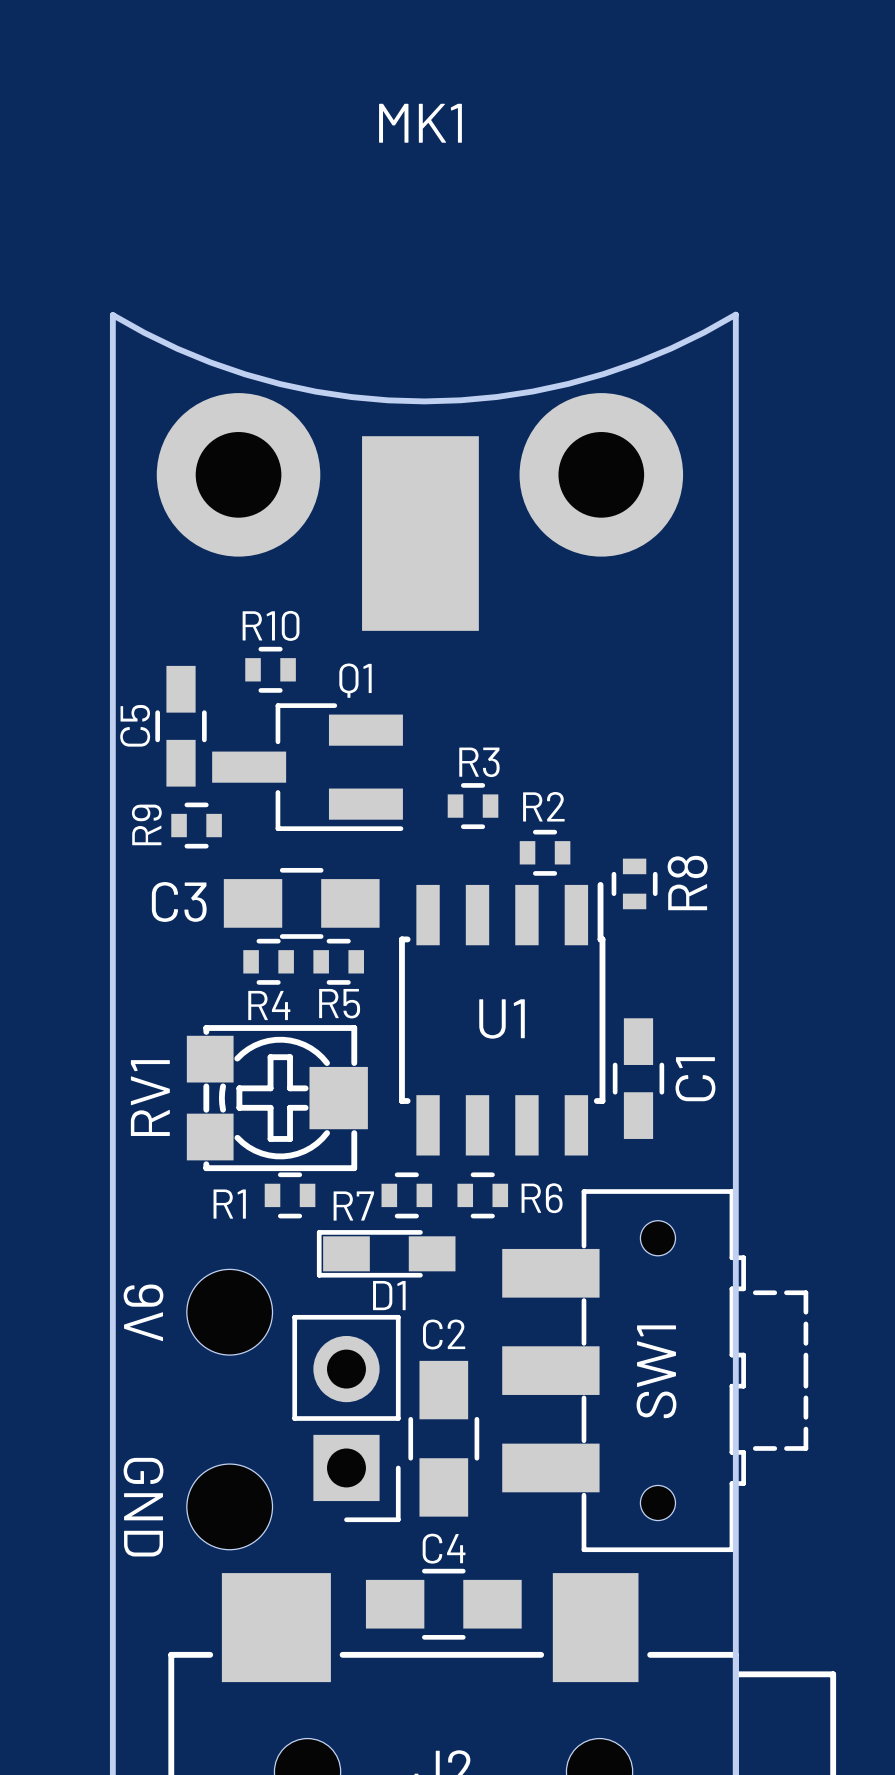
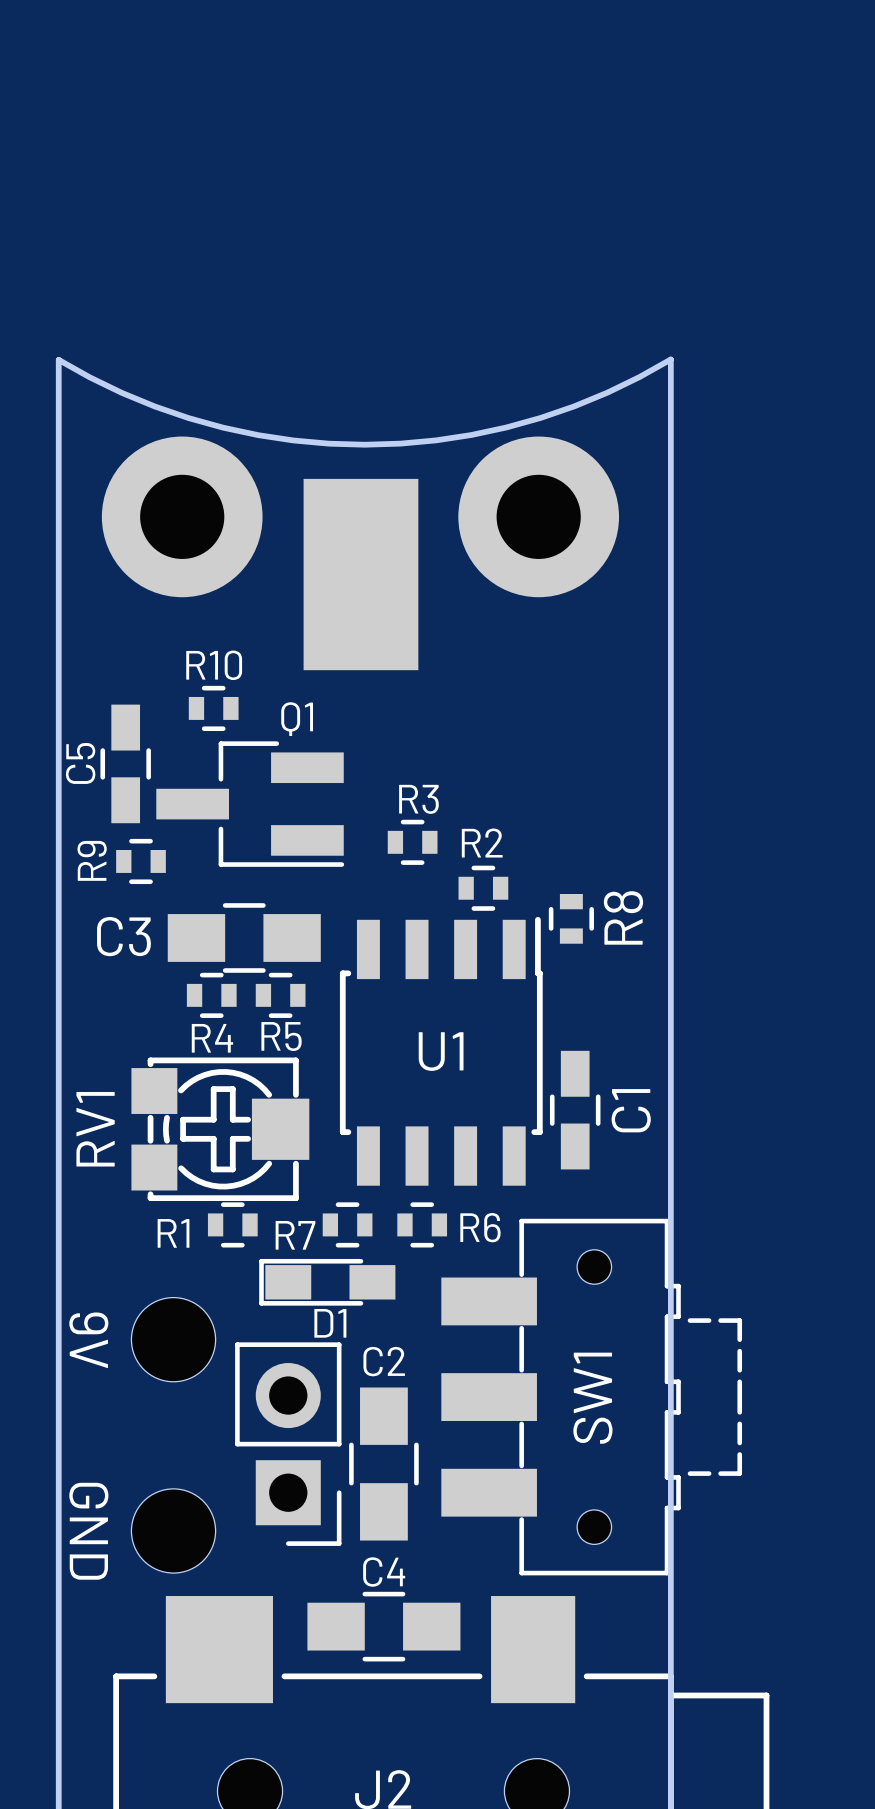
MK1 name: MK1 (420, 123) -> none

